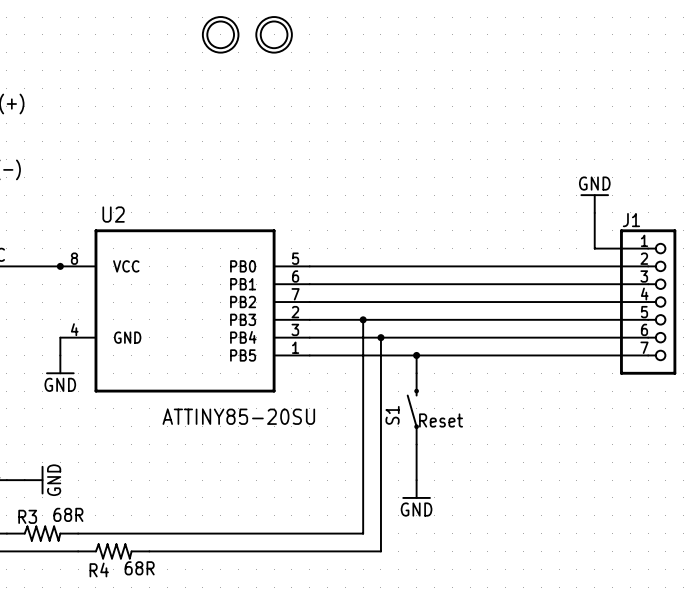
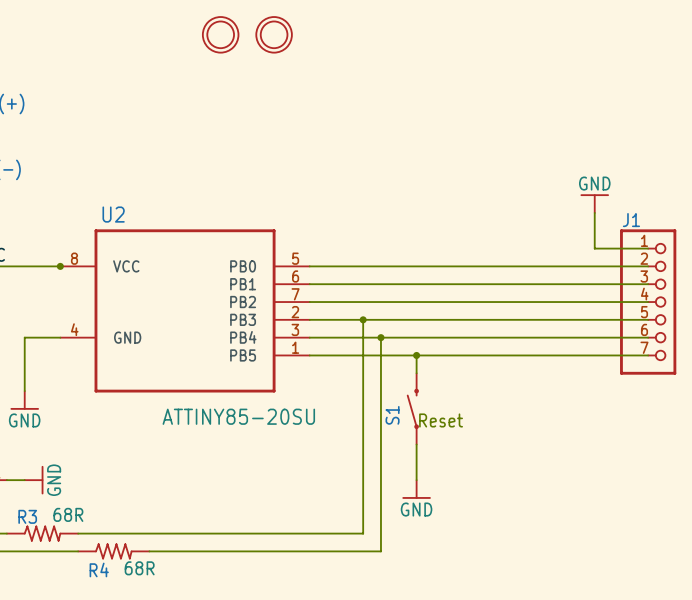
wire: (60, 337) (60, 355) -> (60, 337) (24, 337) (24, 391)
power symbol position: GND (60, 364) -> GND (24, 400)

